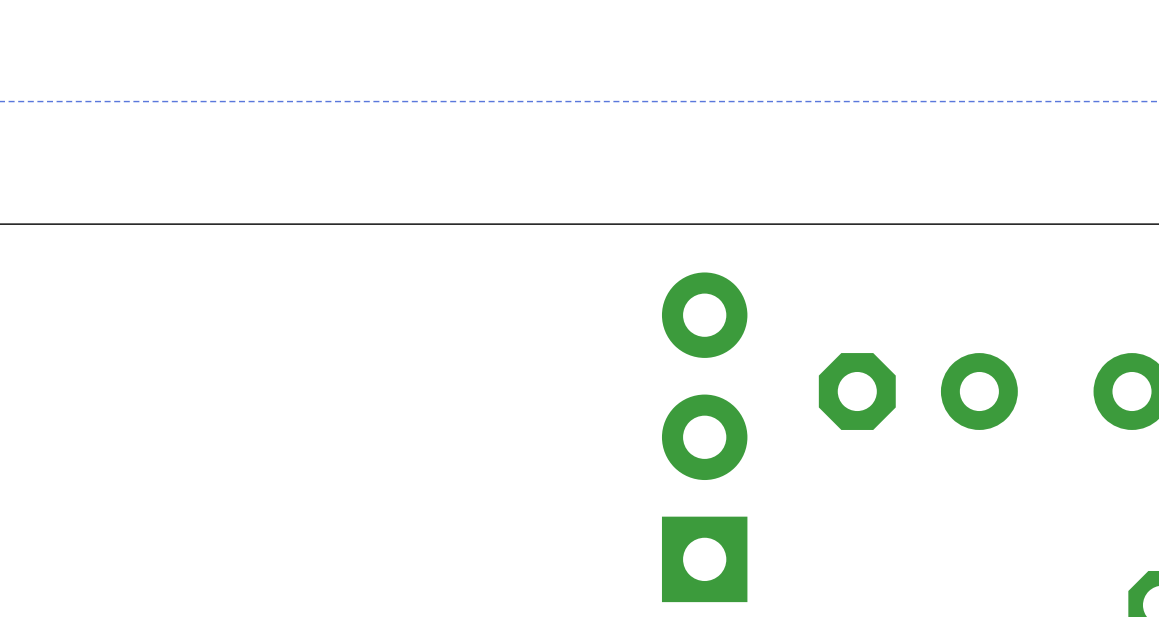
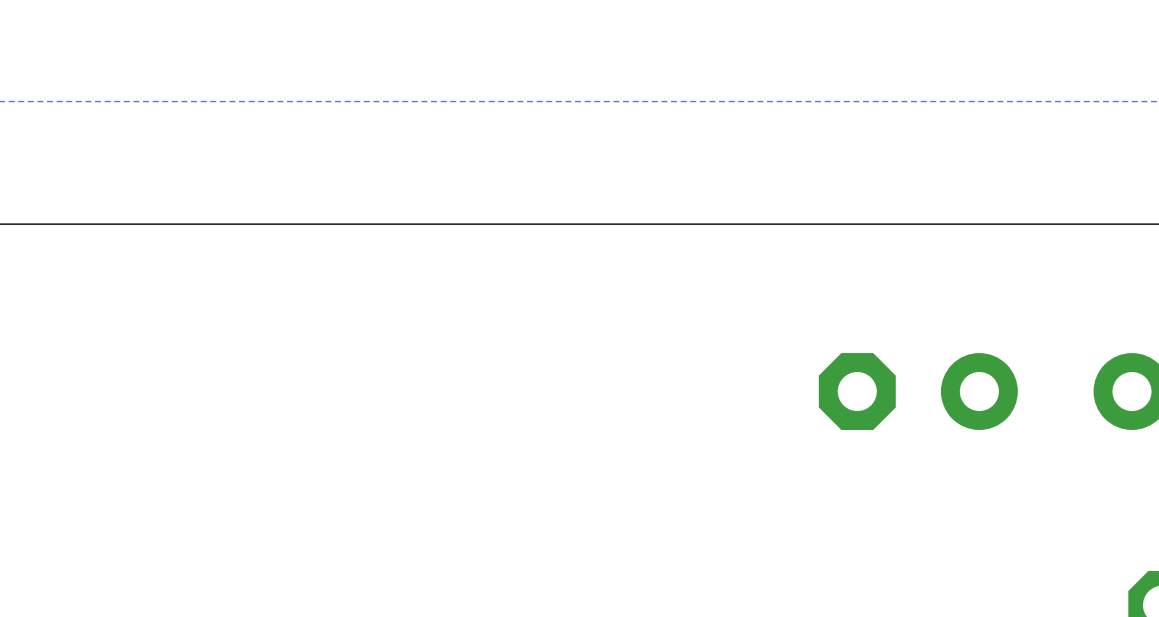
part: (704, 437) -> none

